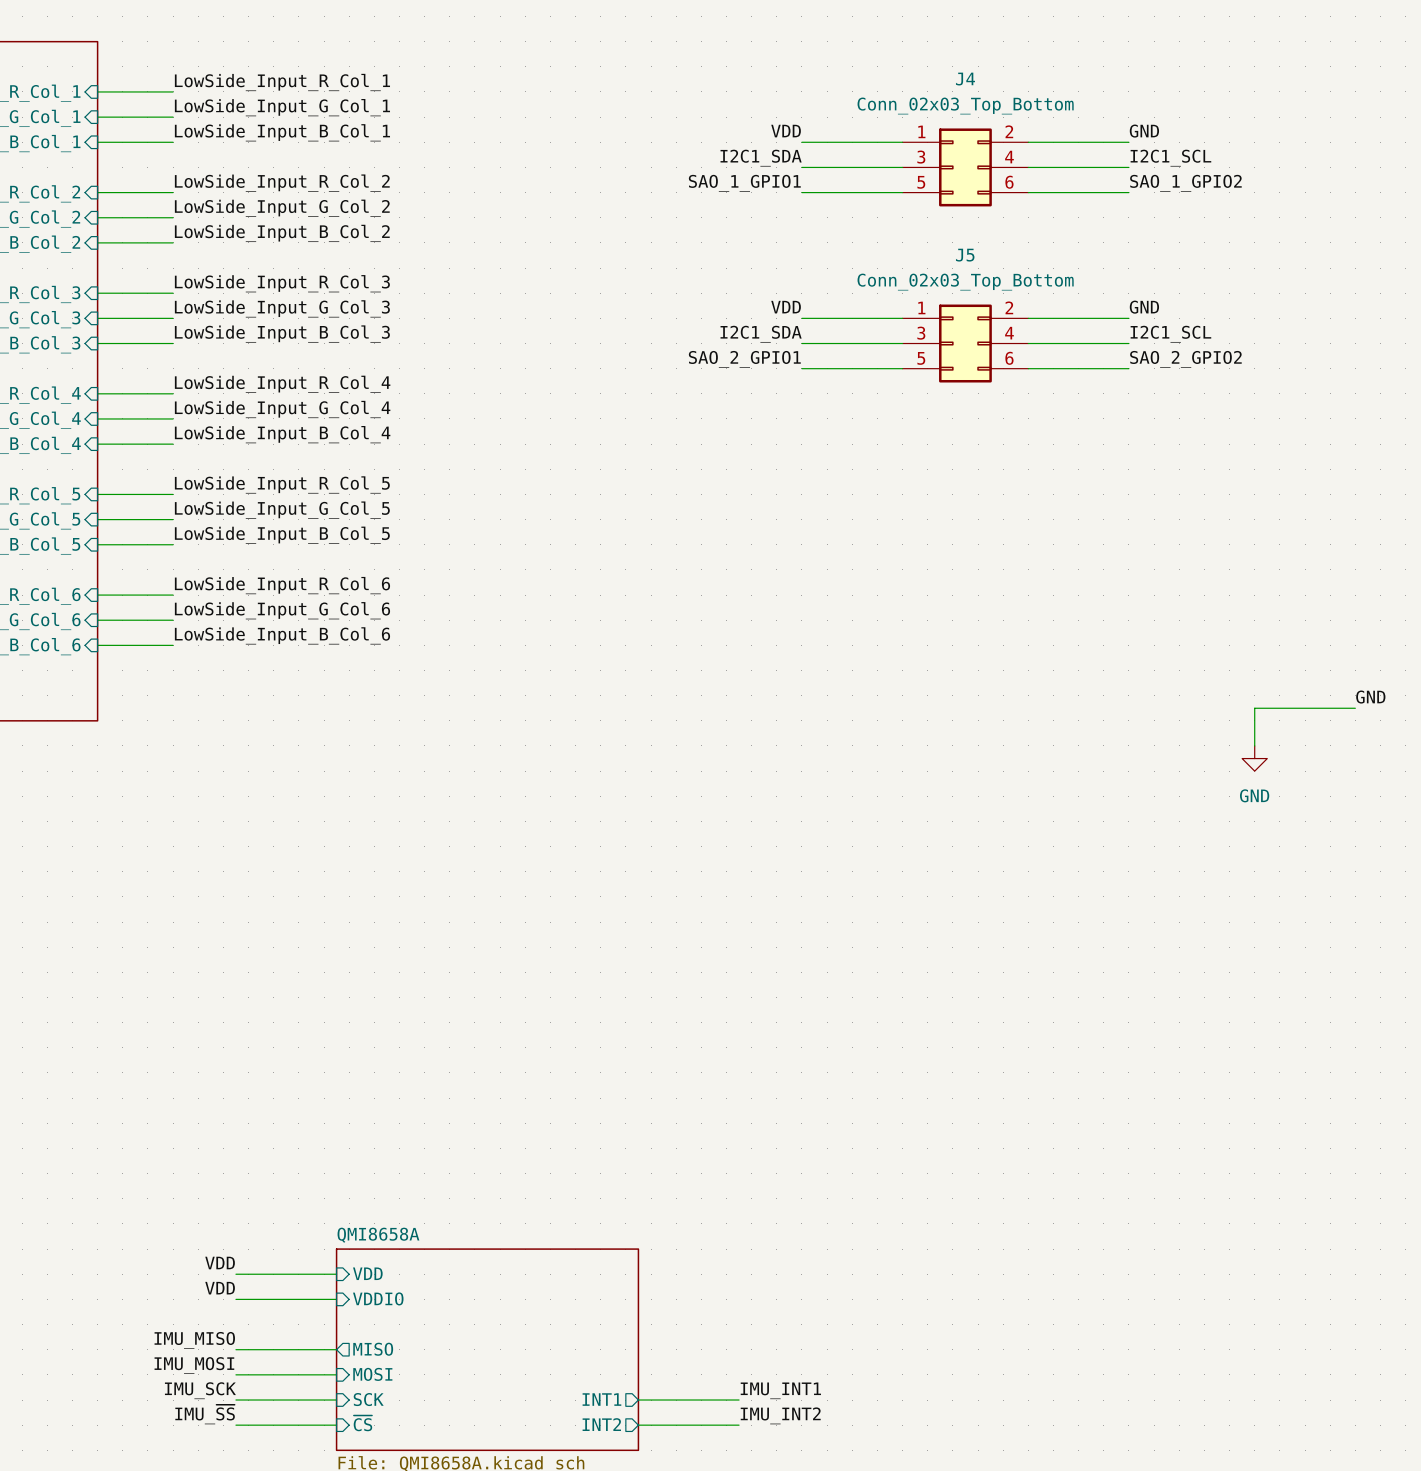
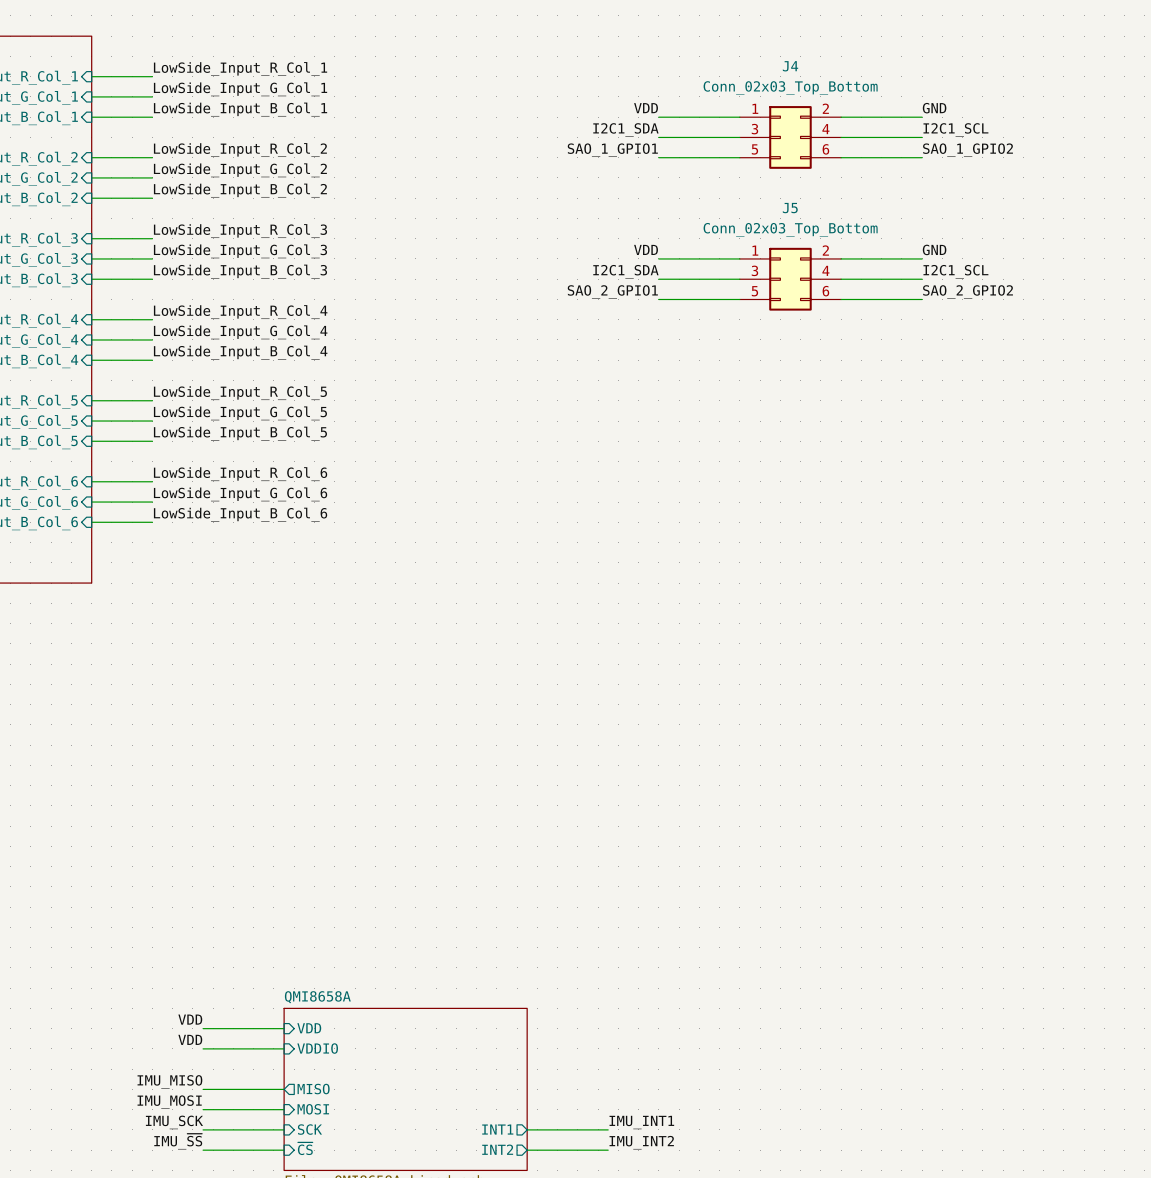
label: GND (1370, 697) -> none
wire: (1355, 708) (1254, 708) (1254, 745) -> none
power symbol: GND (1254, 758) -> none

